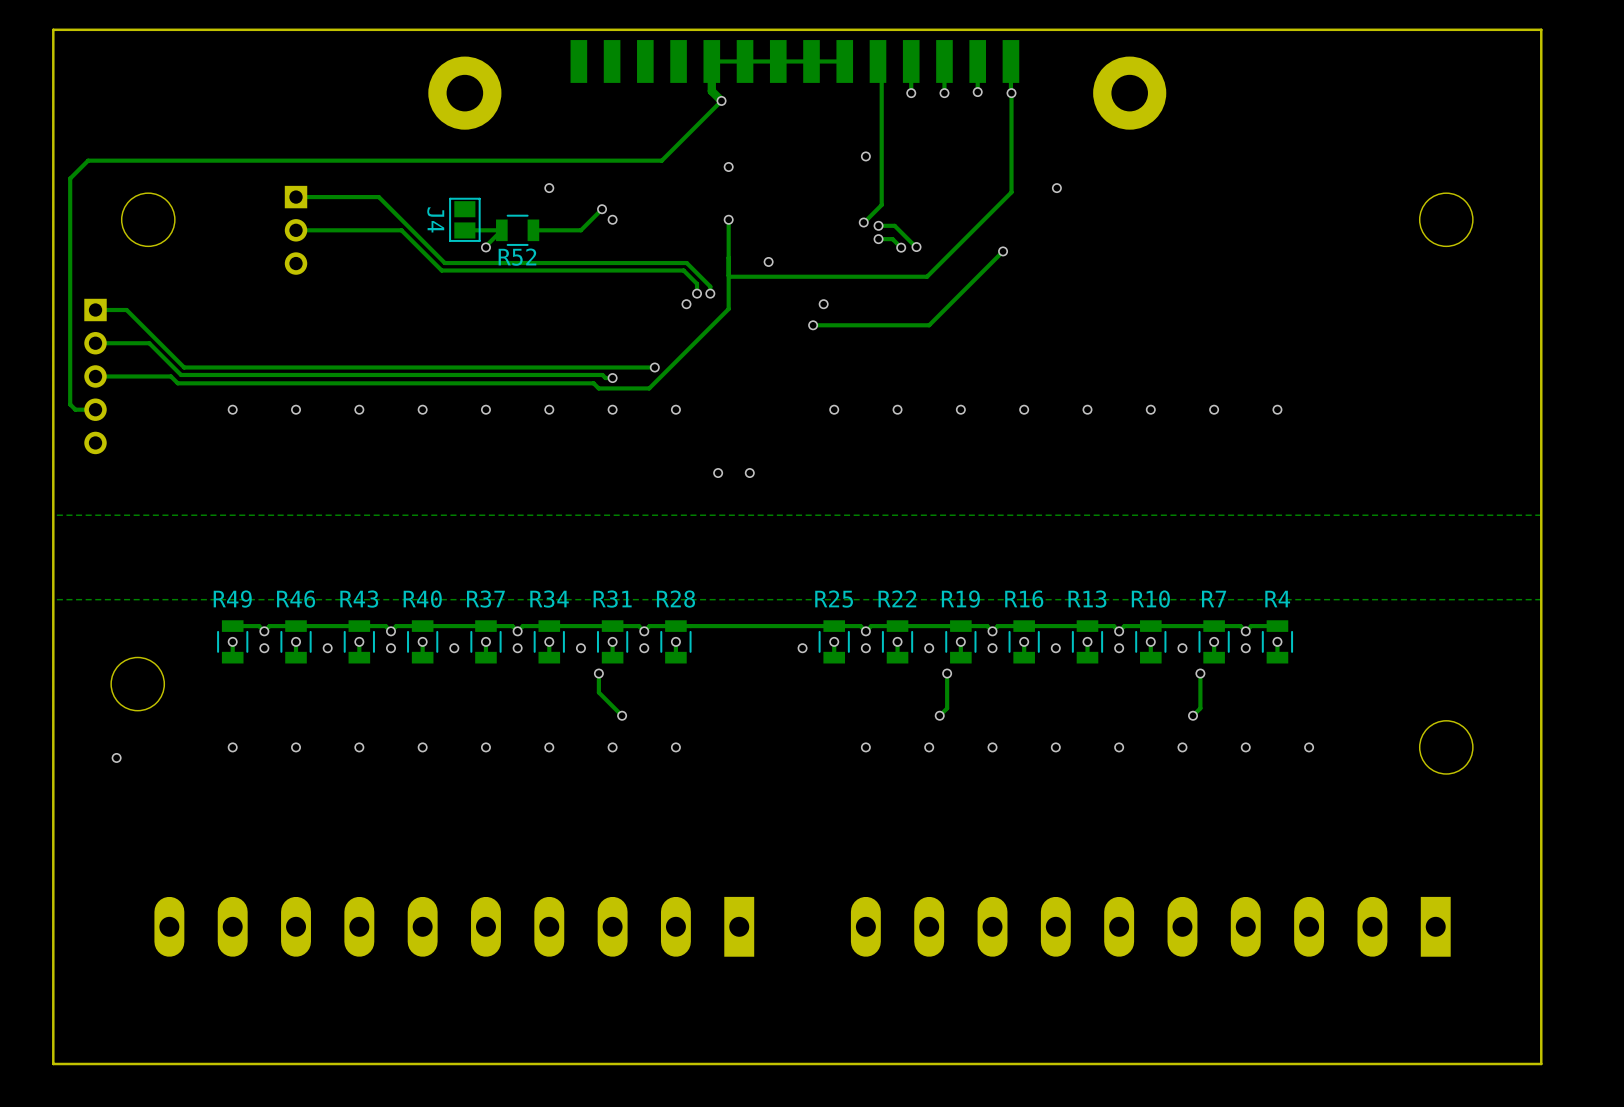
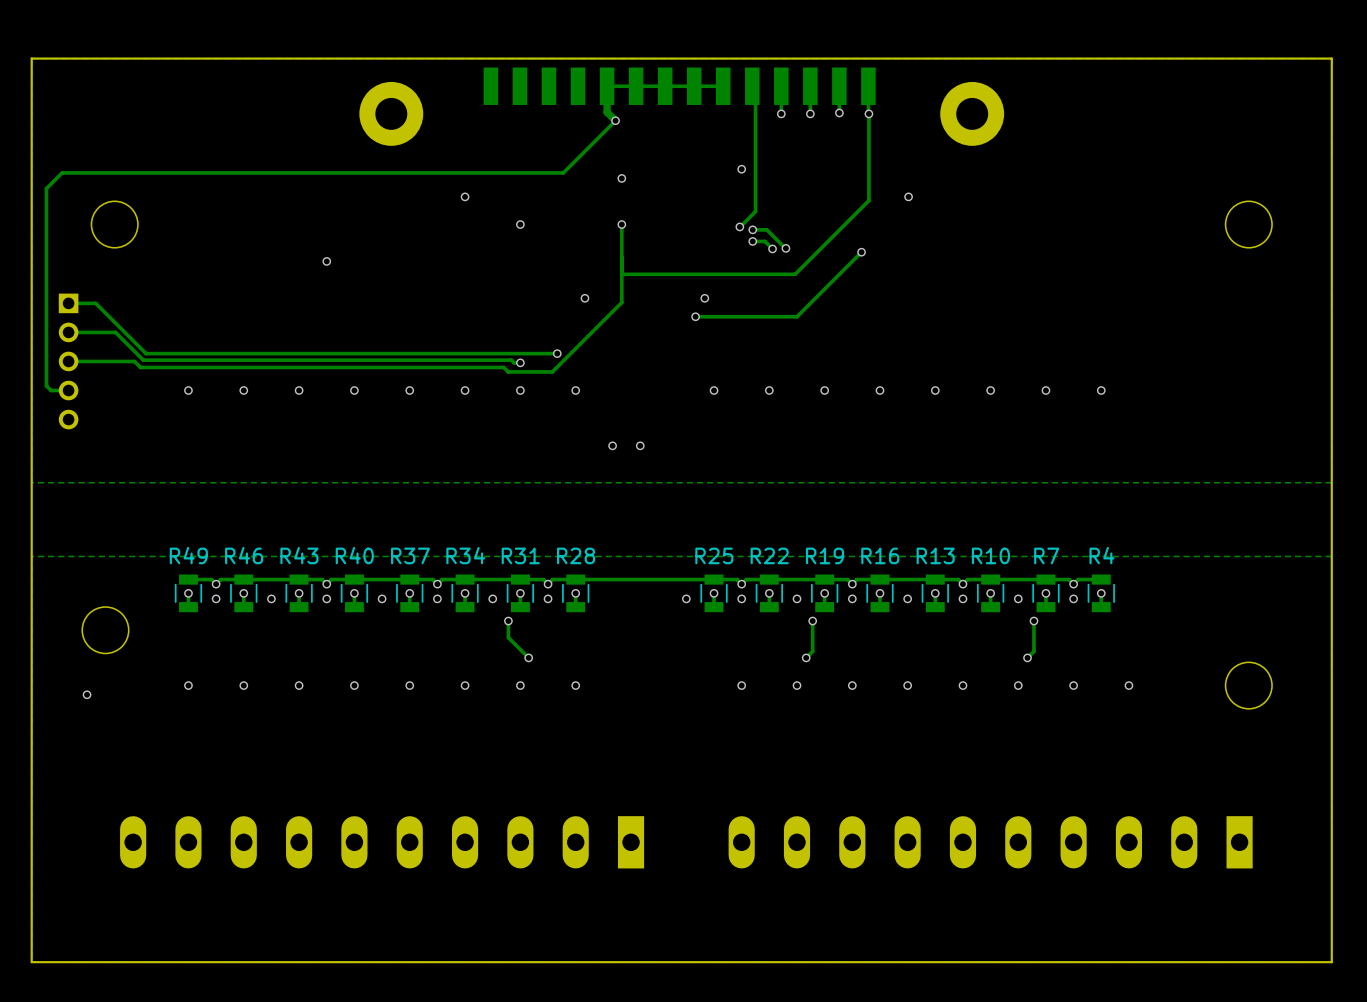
track: (296, 197) (378, 197) (444, 263) (686, 263) (710, 286) (710, 293) -> none
track: (602, 209) (580, 230) (533, 230) -> none
via: (602, 209) -> none
J4: (464, 219) -> none
track: (296, 230) (401, 230) (441, 270) (683, 270) (697, 283) (697, 293) -> none
part: (296, 230) -> none
track: (465, 230) (501, 230) (485, 247) -> none
R52: (517, 230) -> none
via position: (485, 247) -> (326, 261)
via: (768, 261) -> none
via: (697, 293) -> none
via: (710, 293) -> none

